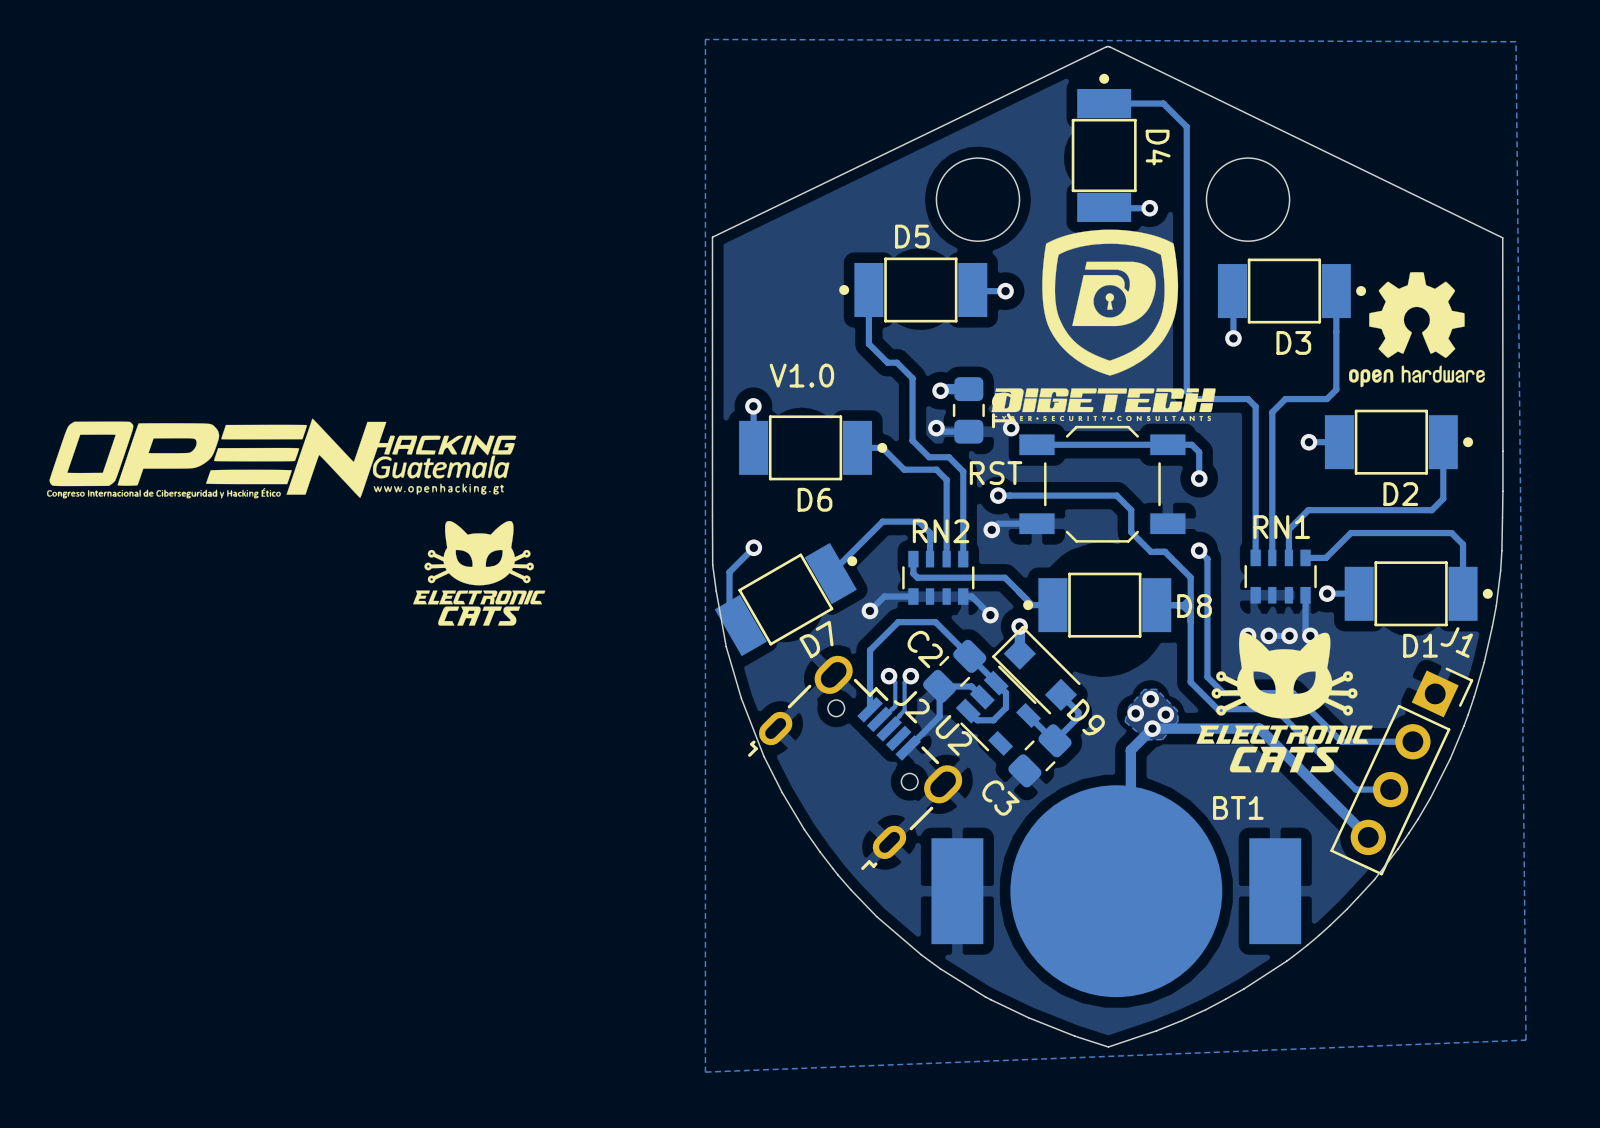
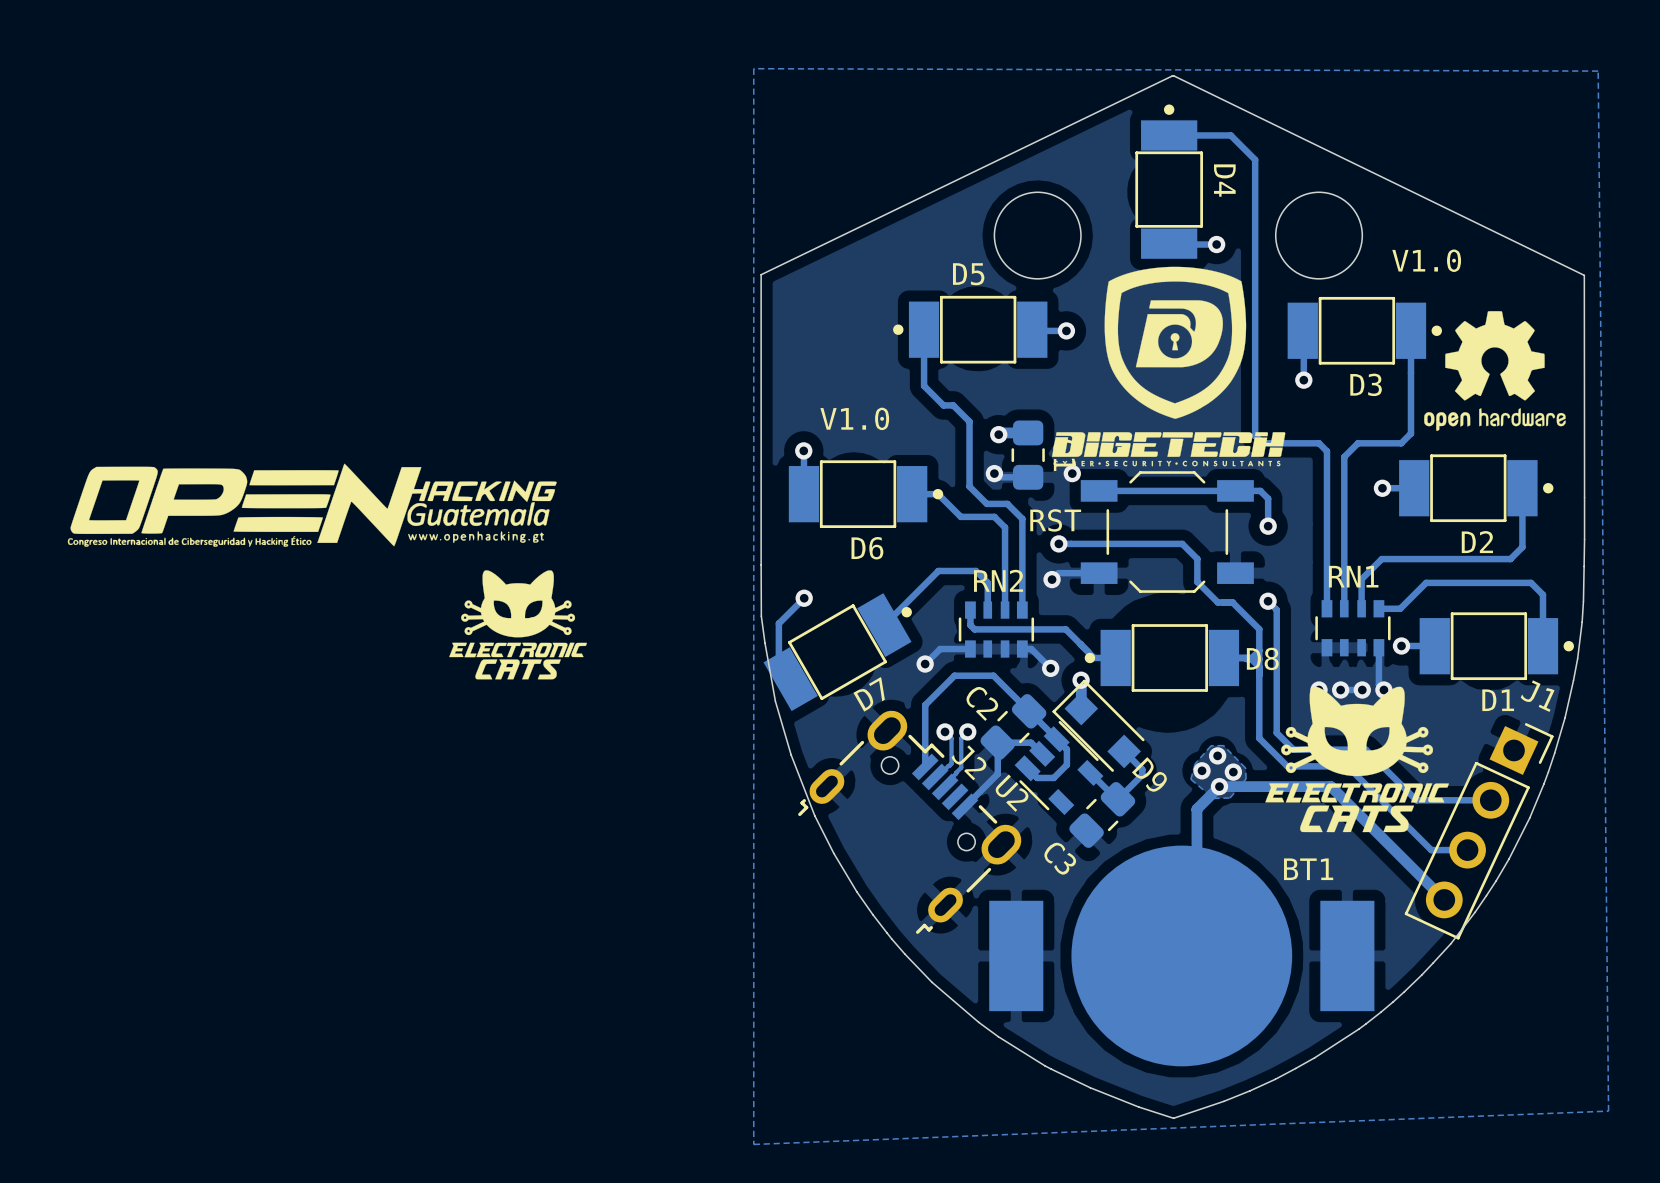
text: none -> V1.0 (1426, 260)

